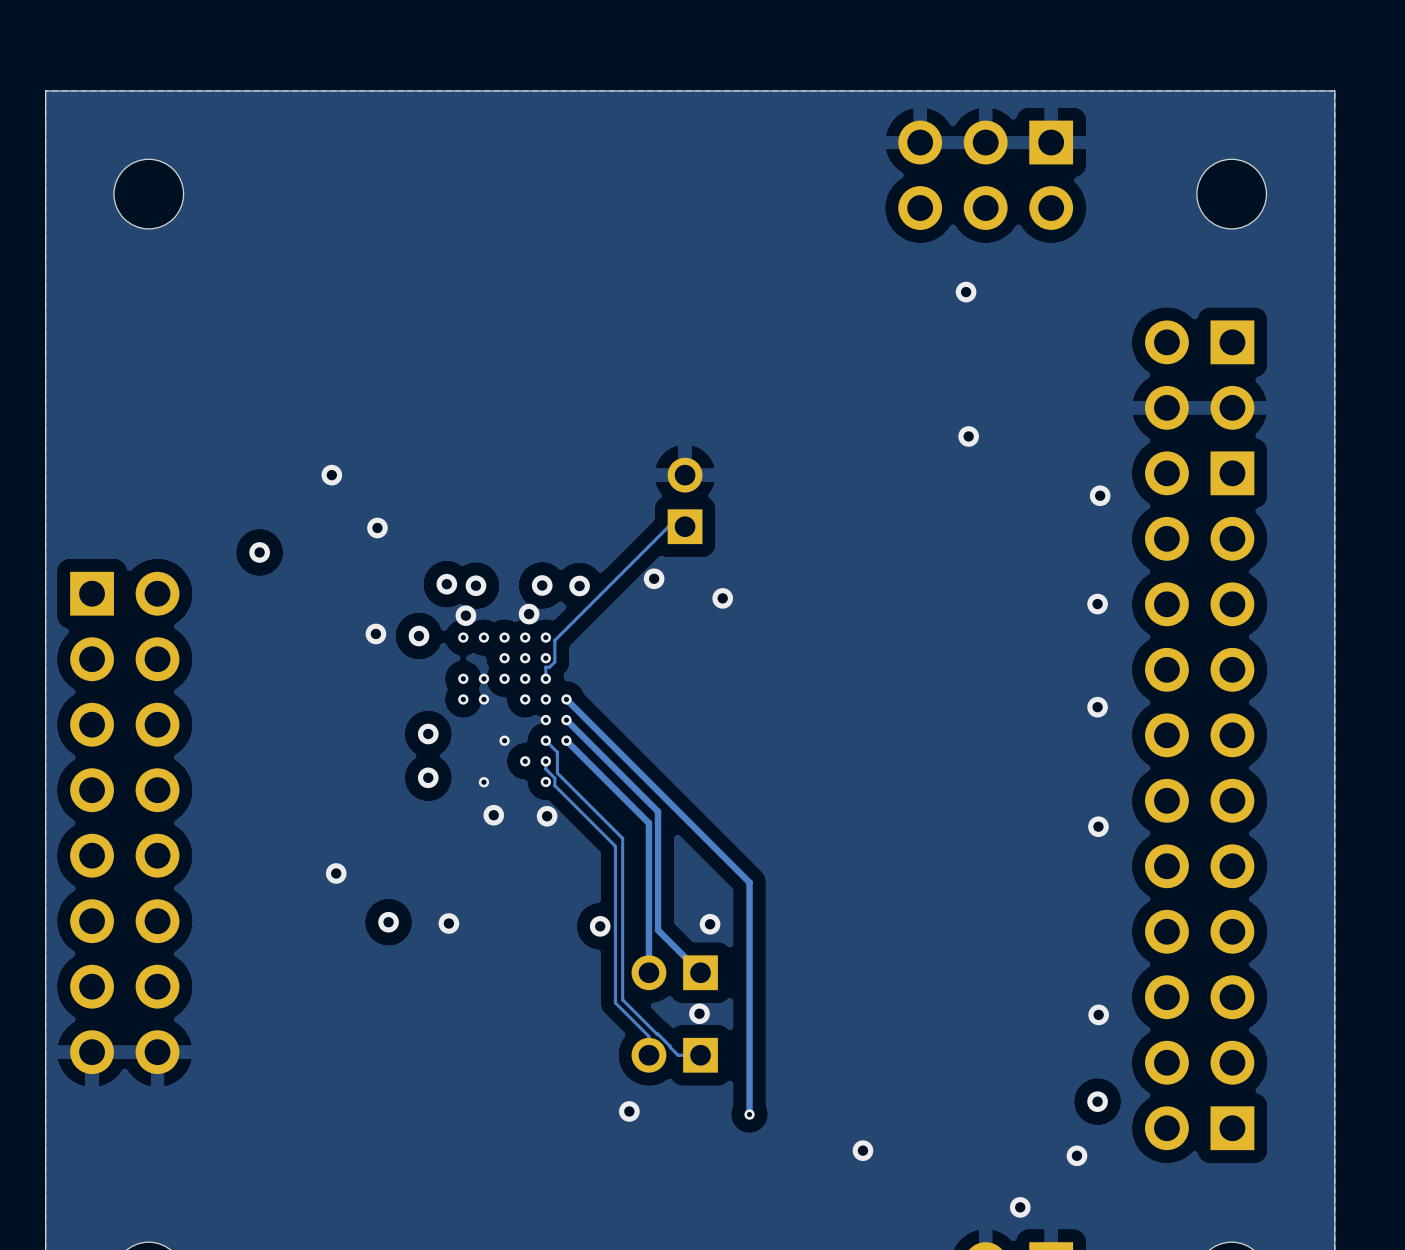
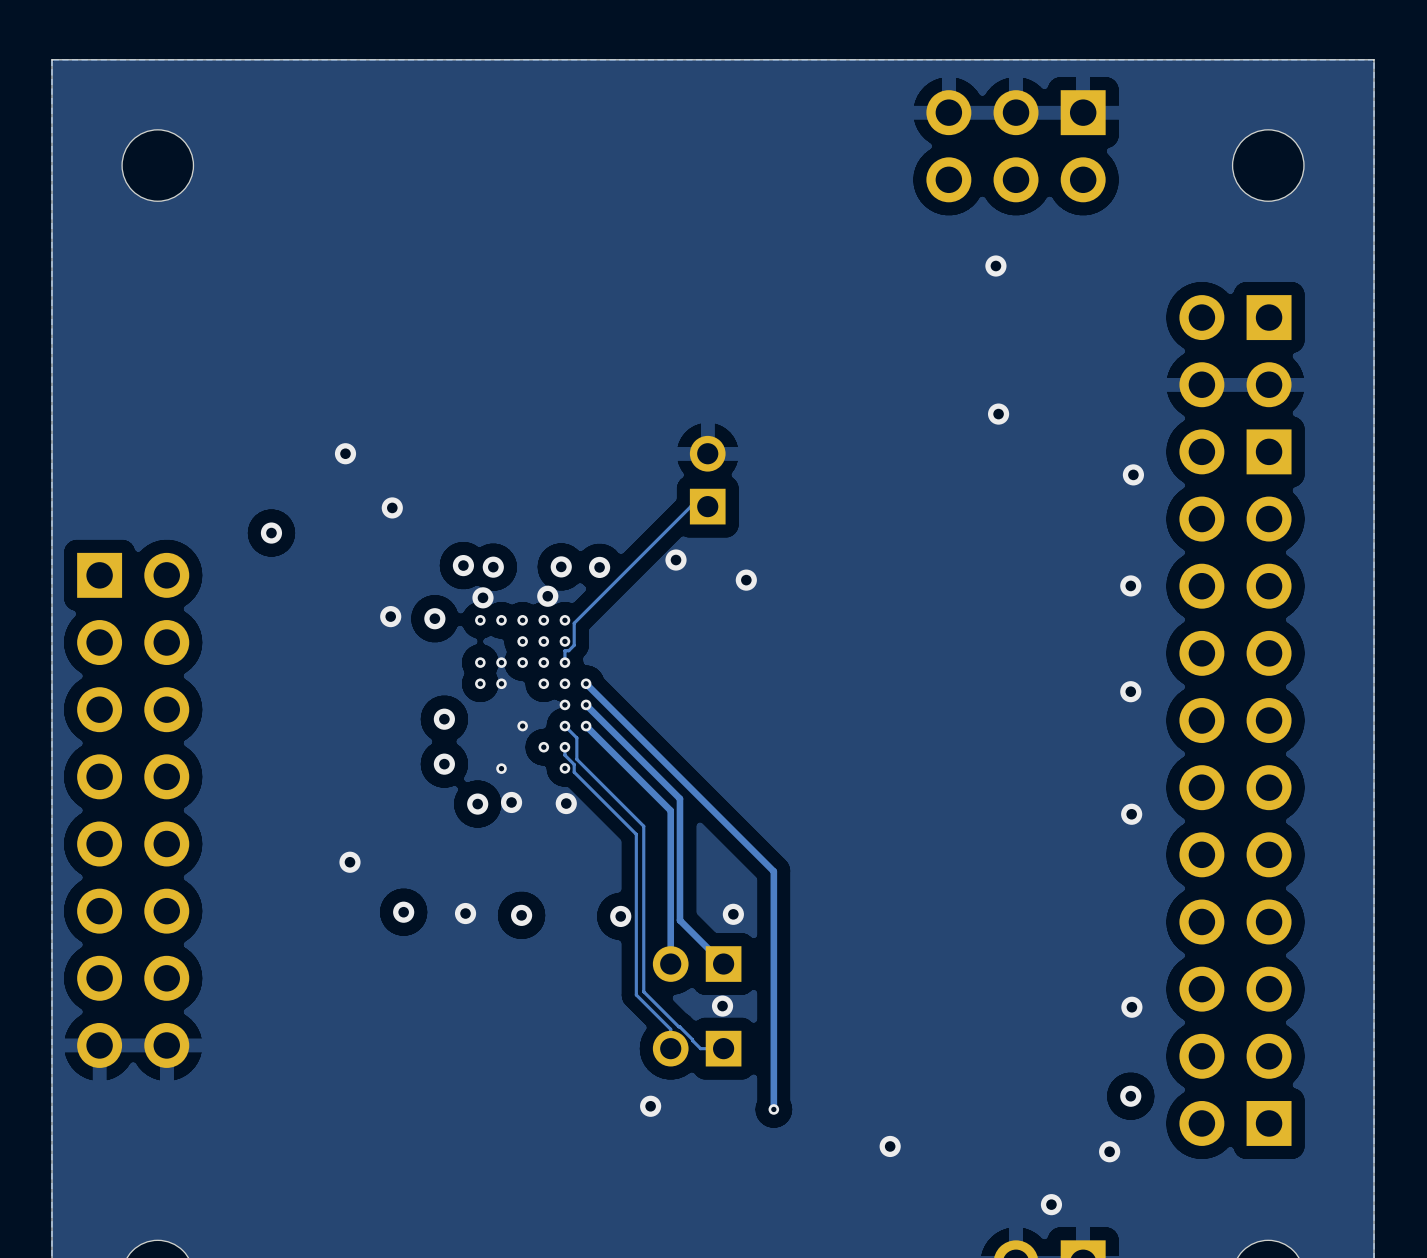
via: none -> (477, 804)
via: none -> (521, 915)

